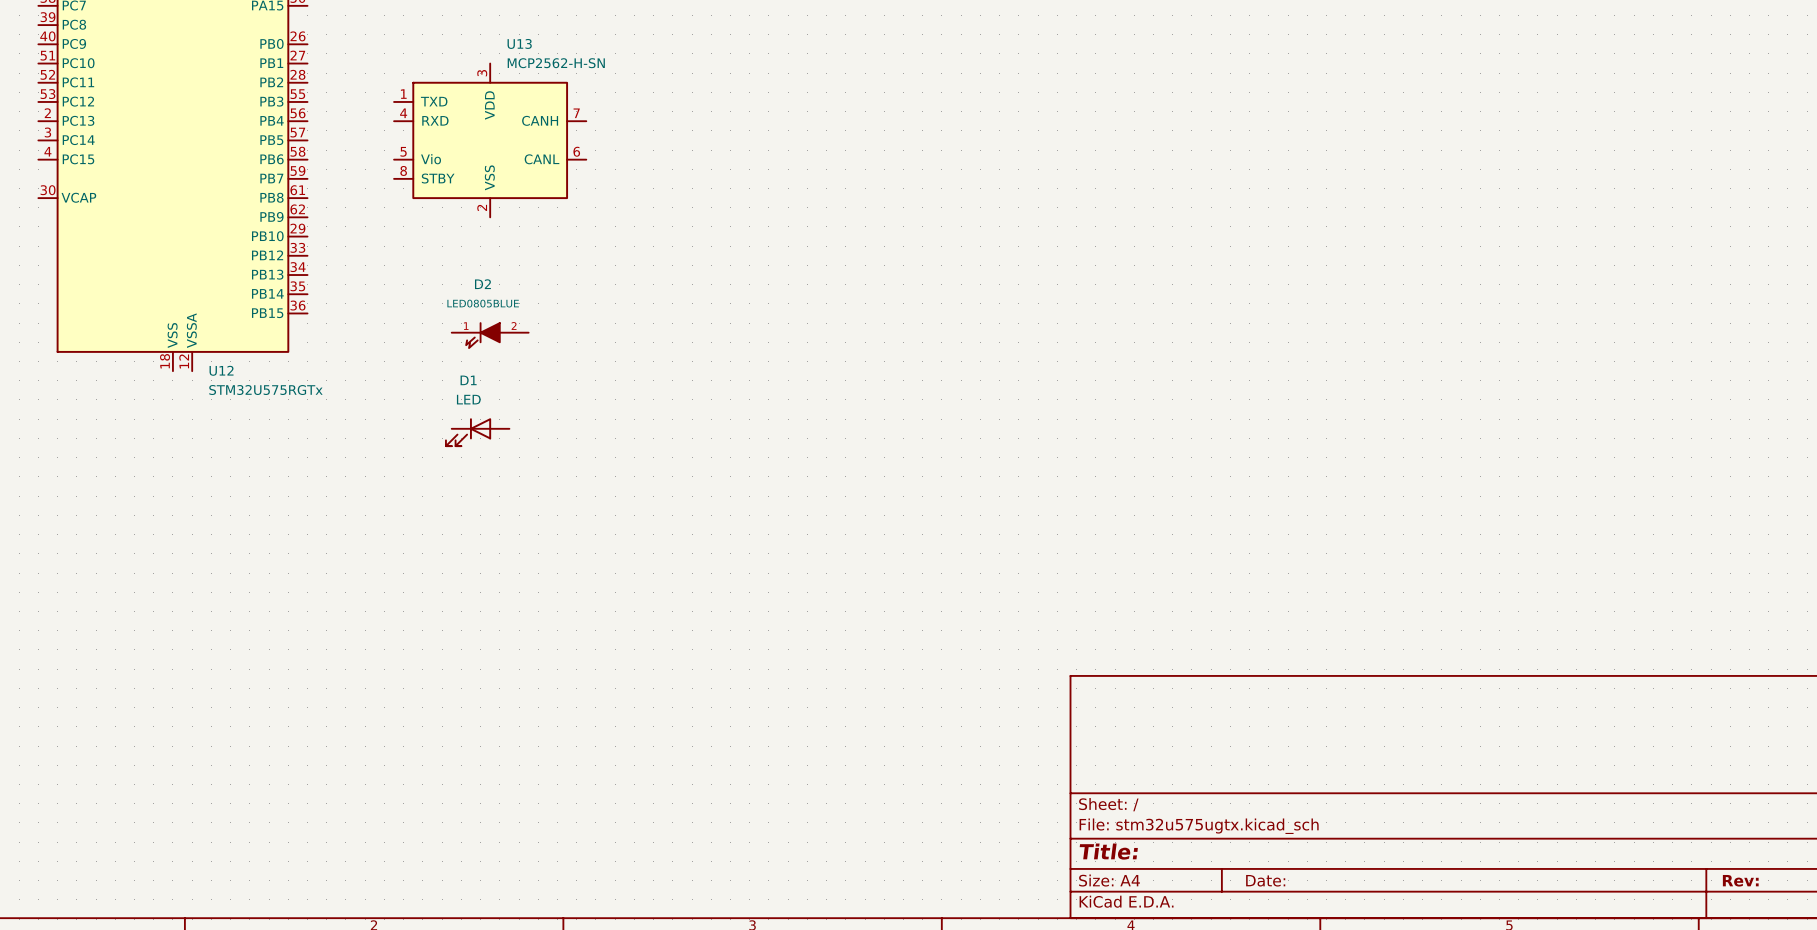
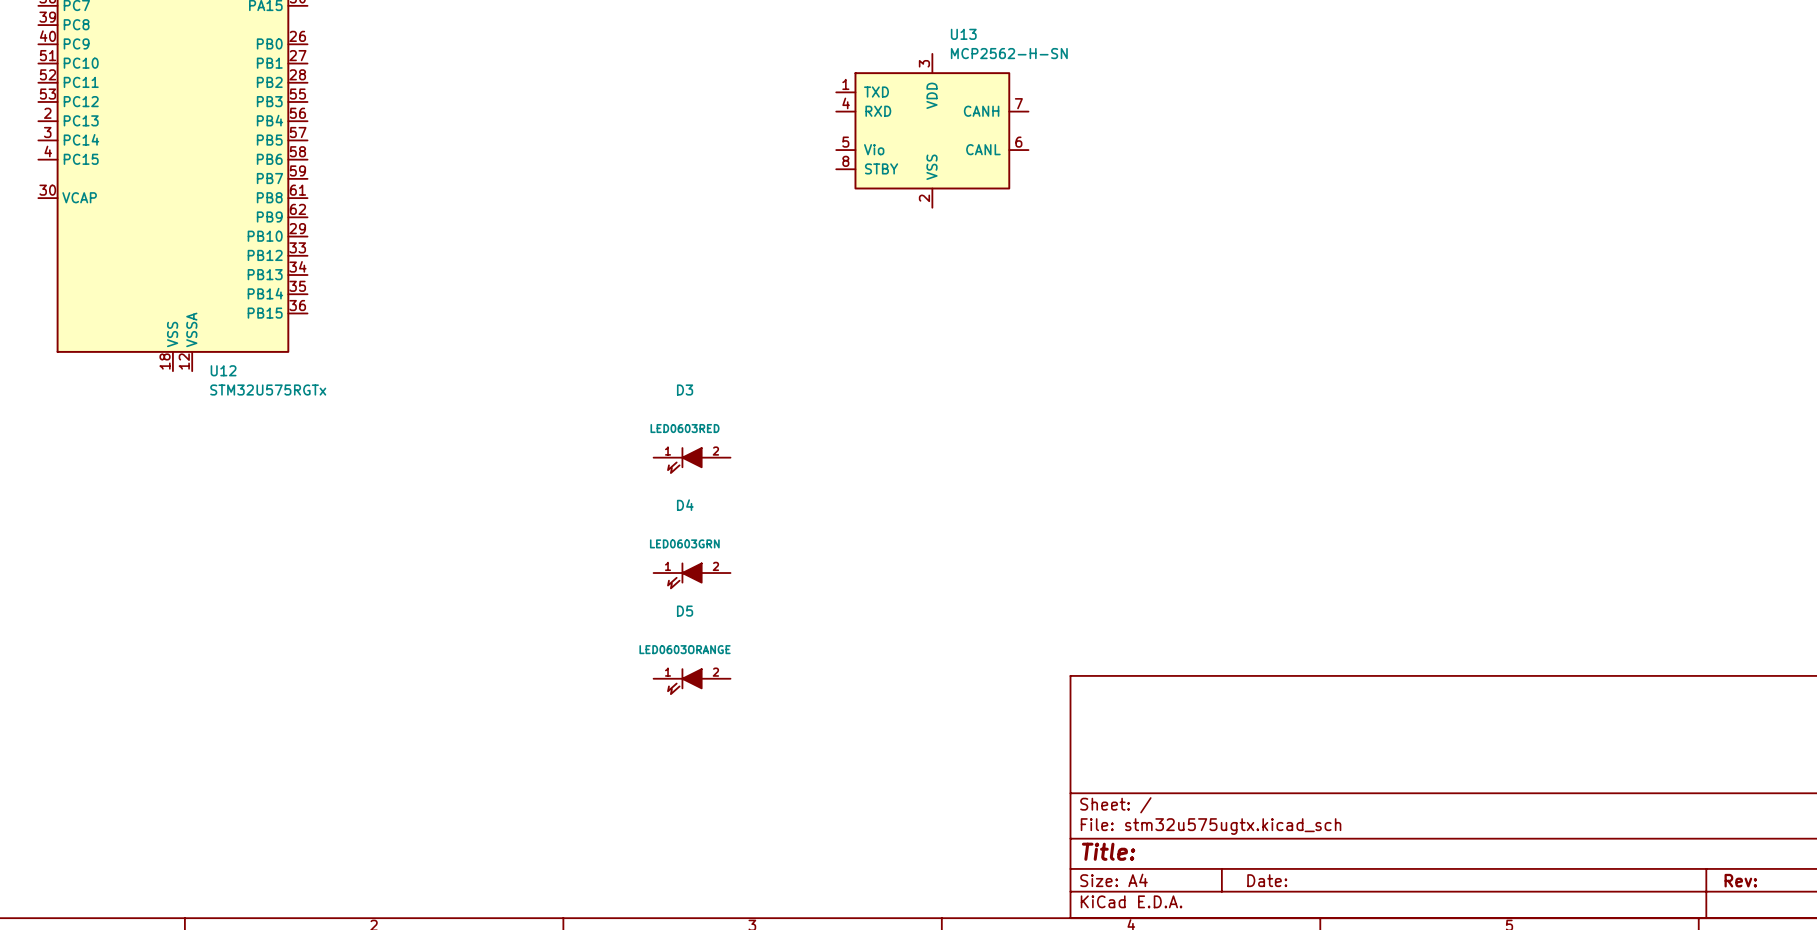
U13 position: (490, 140) -> (932, 130)
D2: (490, 335) -> none
D1: LED (477, 432) -> none
D3: none -> (692, 460)
D4: none -> (692, 575)
D5: none -> (692, 681)

